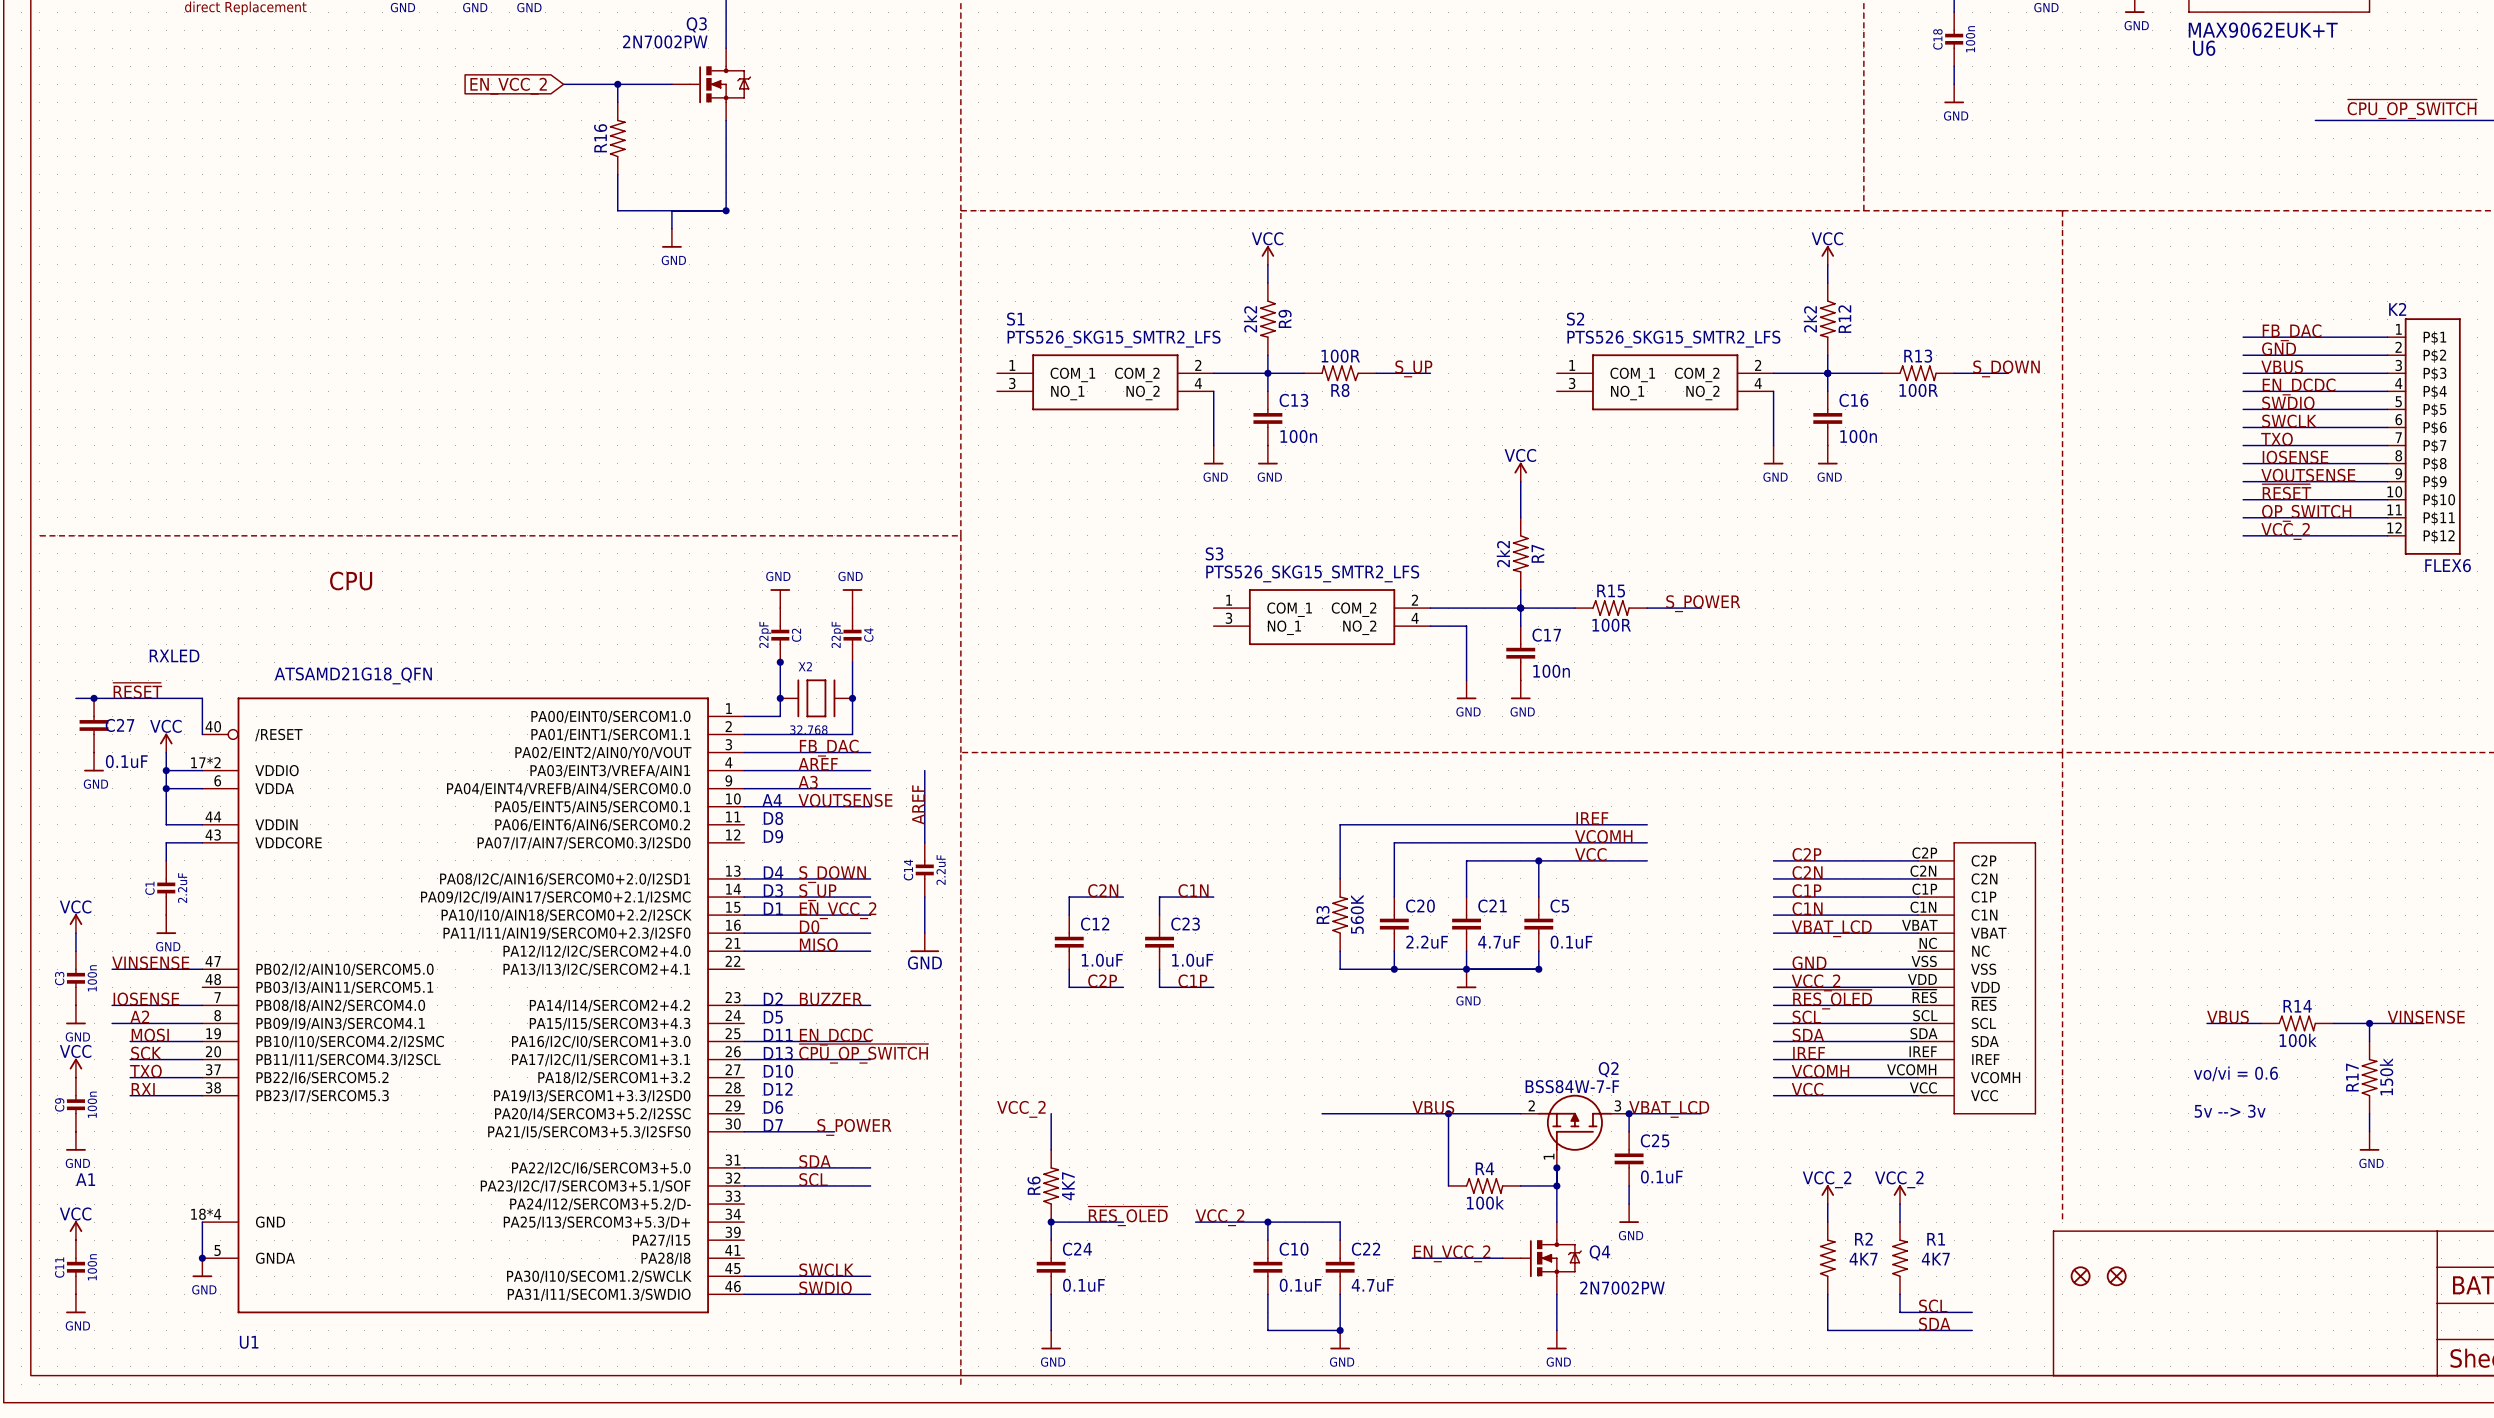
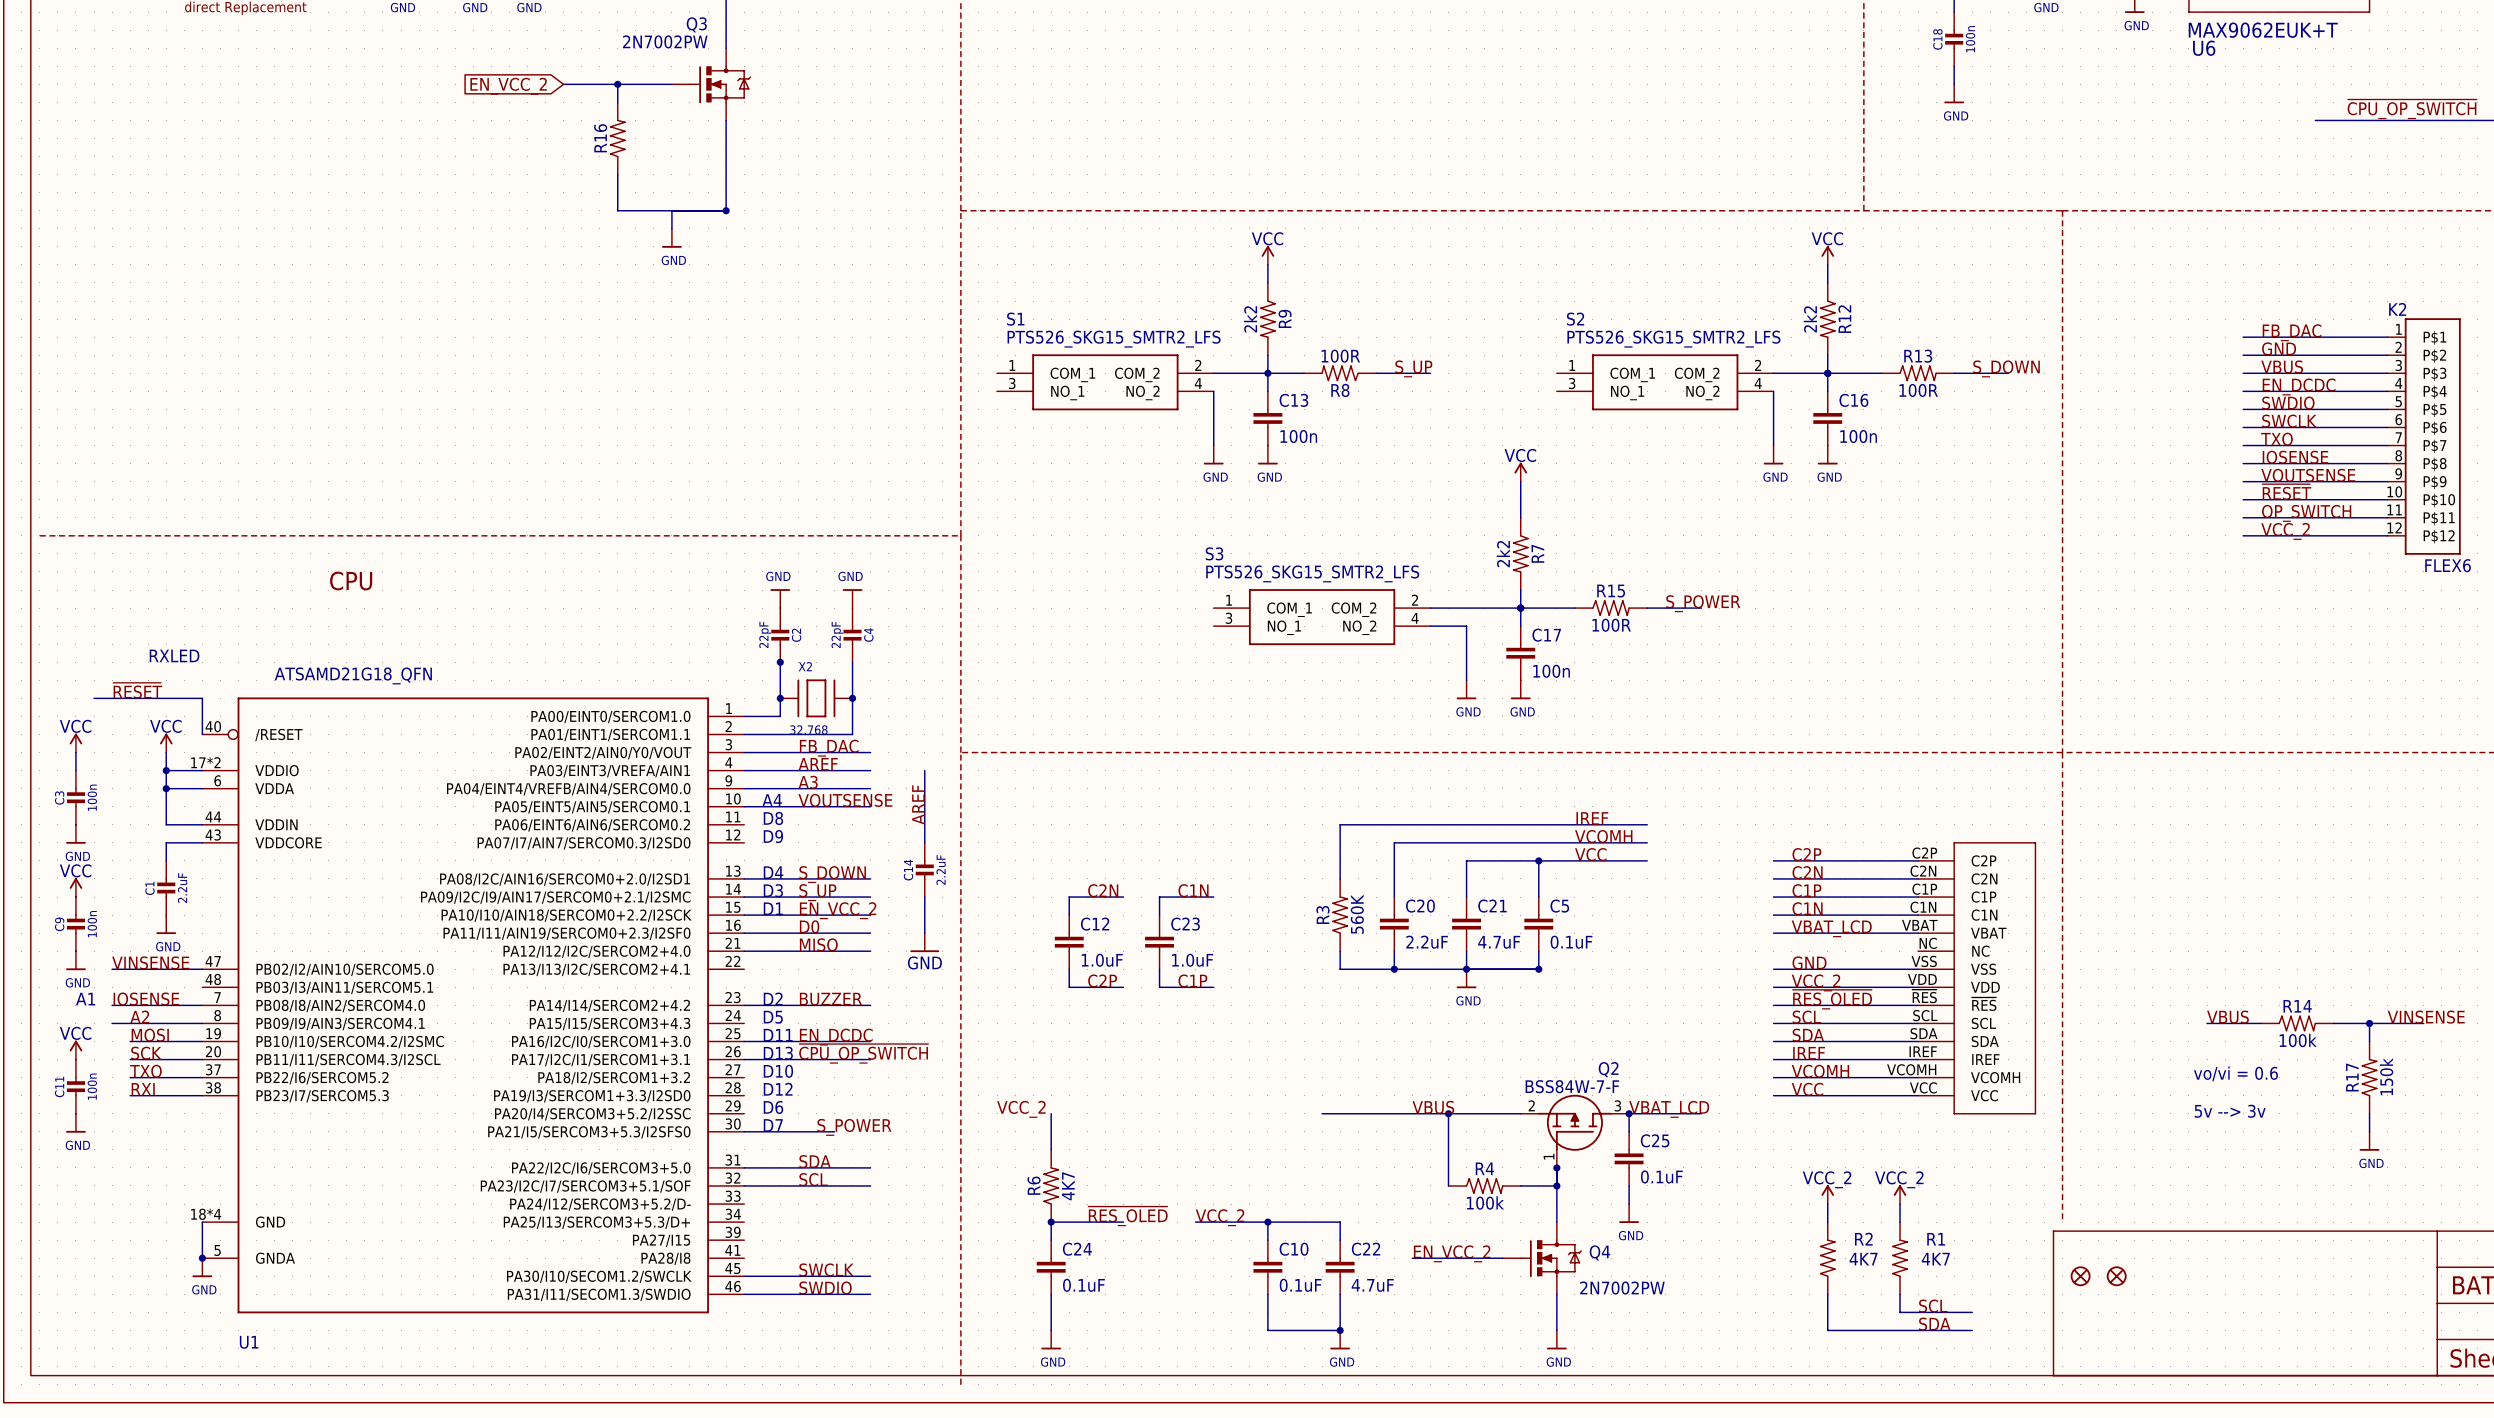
wire: (75, 698) (94, 698) -> none
junction: (94, 698) -> none
C27: 0.1uF (94, 725) -> none
power symbol: none -> VCC (75, 743)
wire: none -> (75, 752) (75, 770)
power symbol position: GND (94, 762) -> GND (75, 834)
power symbol position: VCC (75, 923) -> VCC (75, 887)
power symbol: none -> GND (75, 960)
C3 position: (75, 978) -> (75, 797)
text: none -> A1 (85, 999)
power symbol: GND (75, 1014) -> none
power symbol position: VCC (75, 1068) -> VCC (75, 1050)
C9 position: (75, 1104) -> (75, 924)
power symbol position: GND (75, 1141) -> GND (75, 1123)
text: A1 (85, 1179) -> none
power symbol: VCC (75, 1230) -> none
C11 position: (75, 1267) -> (75, 1086)
power symbol: GND (75, 1303) -> none

